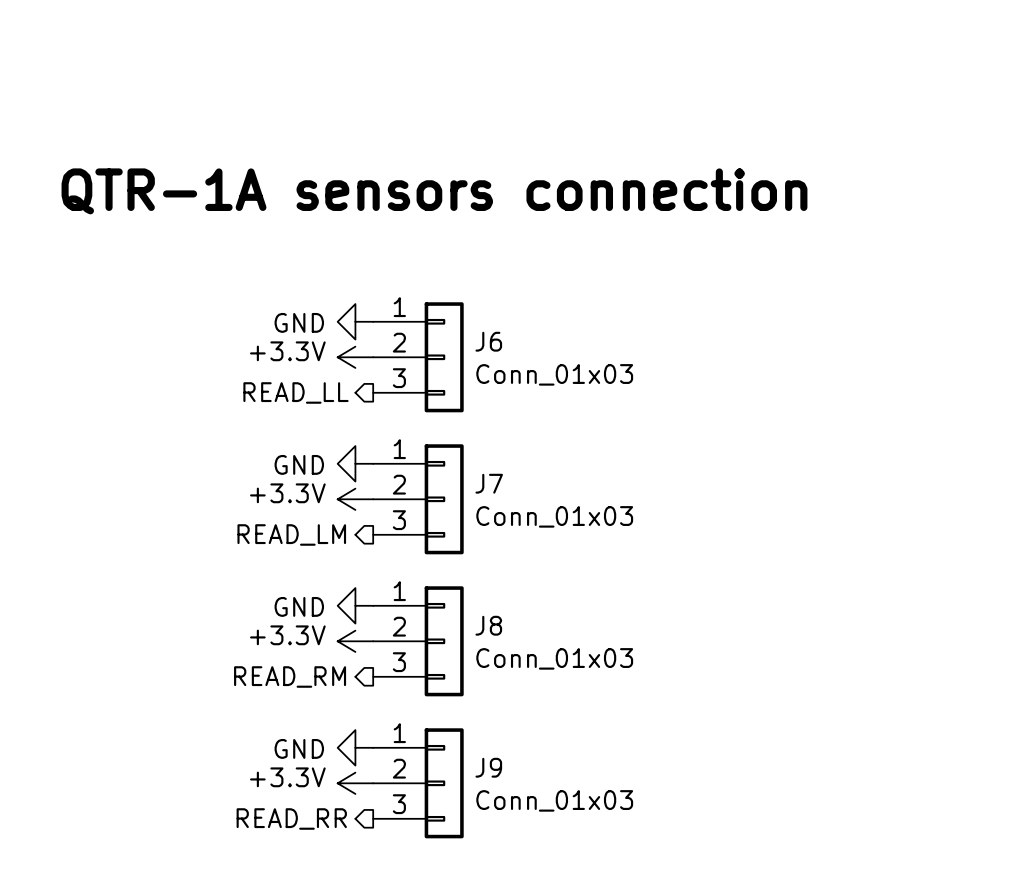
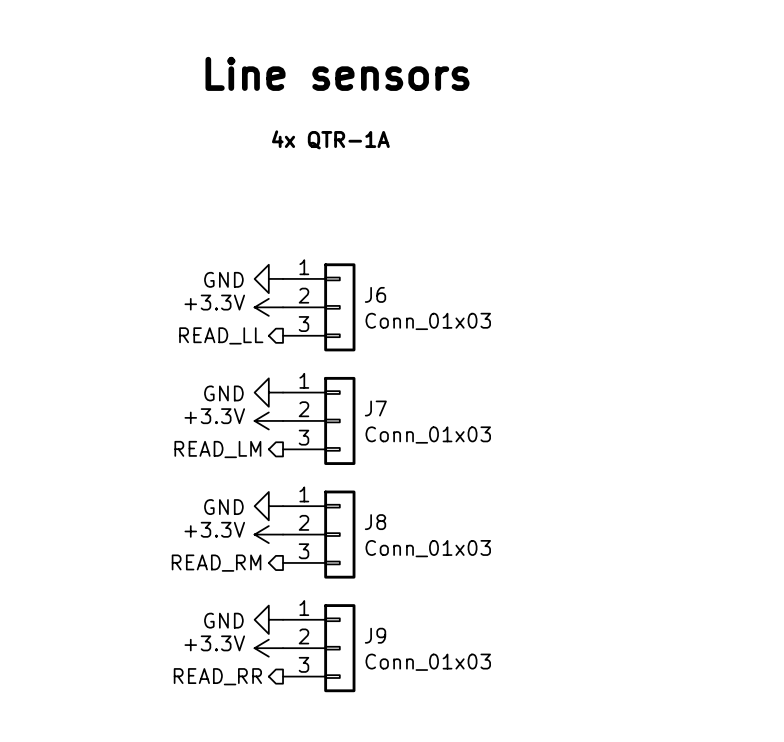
text: none -> Line sensors (337, 73)
text: none -> 4x QTR-1A (330, 139)
text: QTR-1A sensors connection (434, 191) -> none

